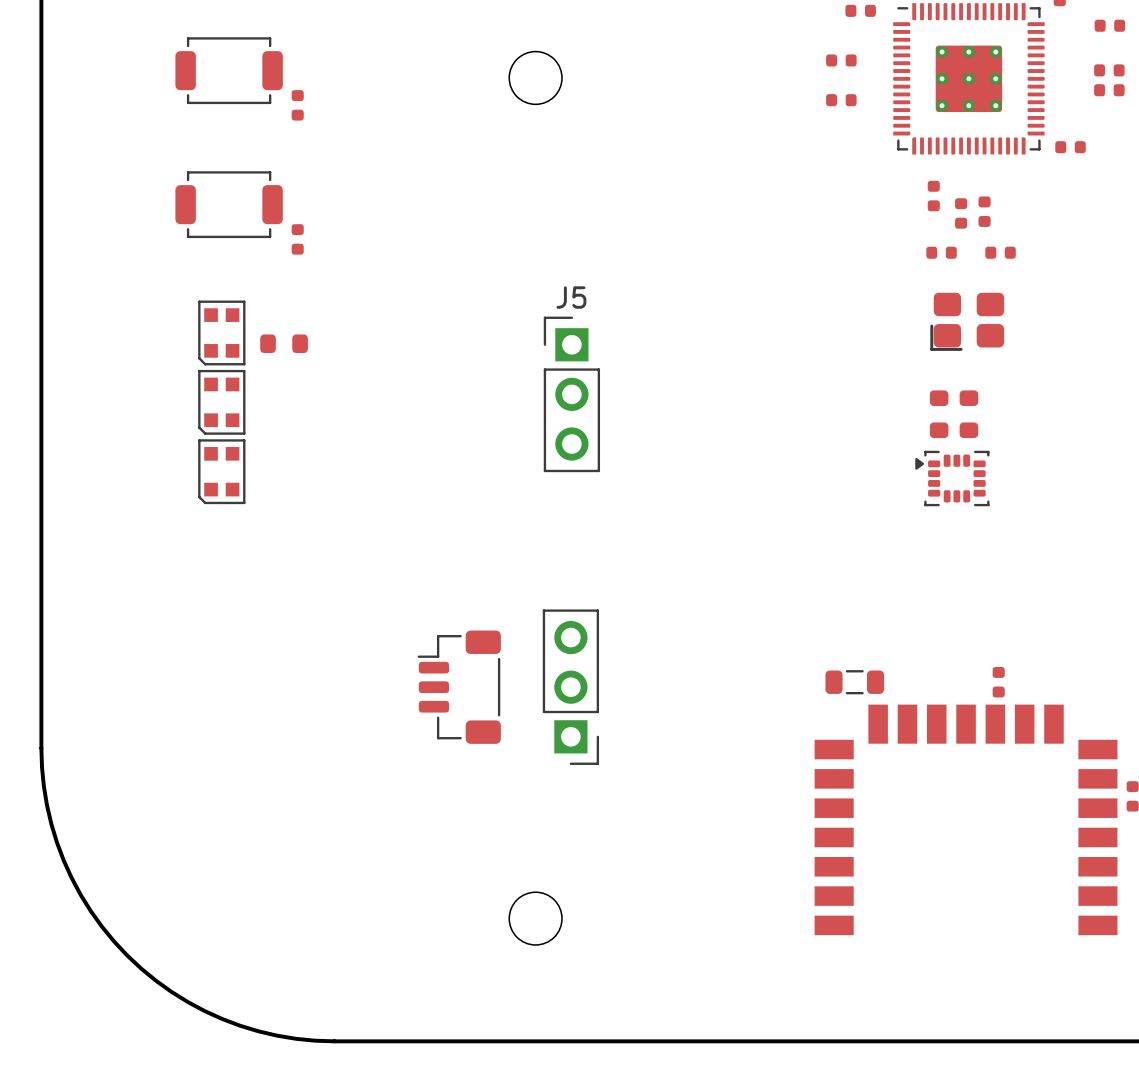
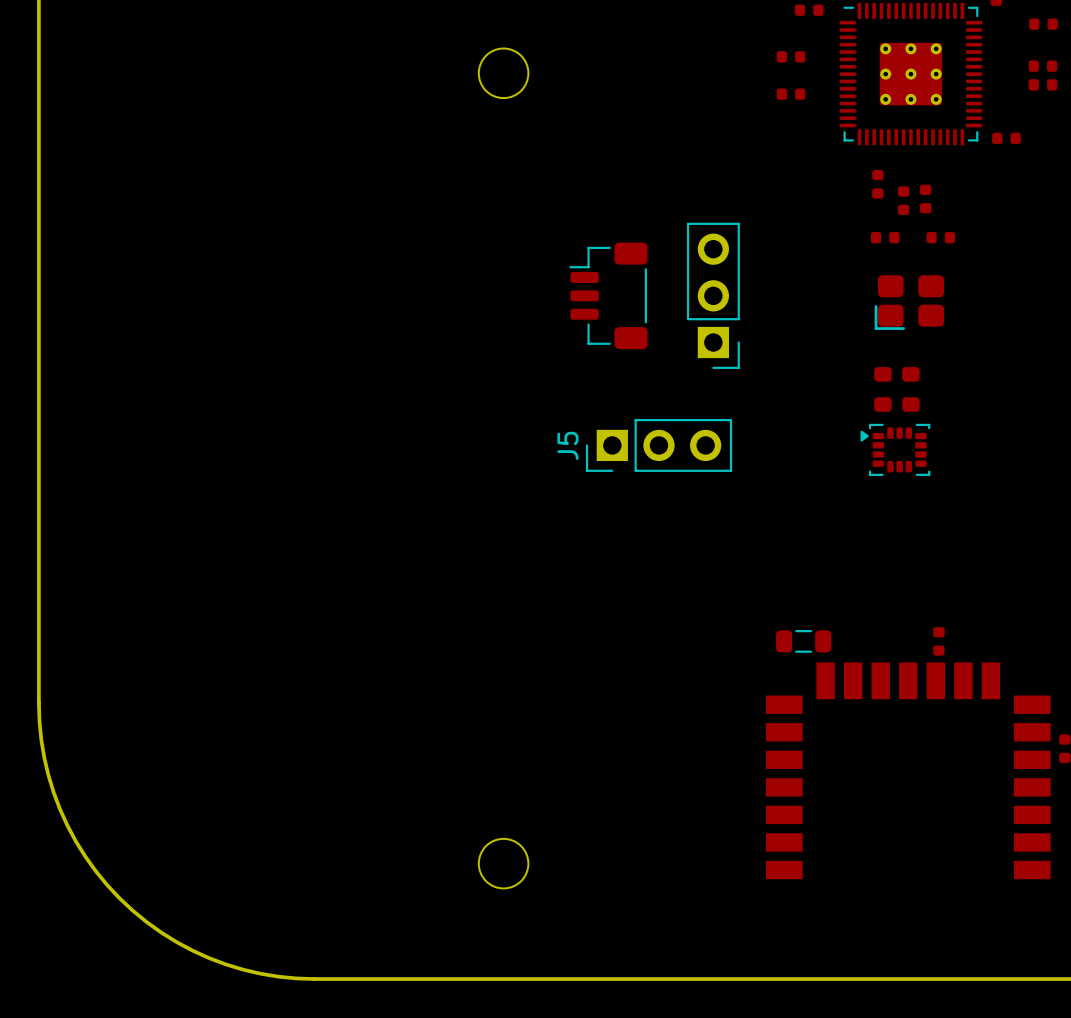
part: (229, 70) -> none
part: (297, 105) -> none
part: (229, 204) -> none
part: (297, 239) -> none
part: (221, 332) -> none
part: (284, 343) -> none
J5 rotation: 0° (571, 394) -> 90° counterclockwise (658, 445)
J5 position: (571, 394) -> (658, 445)
part: (221, 402) -> none
part: (221, 471) -> none
part position: (459, 687) -> (608, 295)
part position: (570, 687) -> (713, 295)

